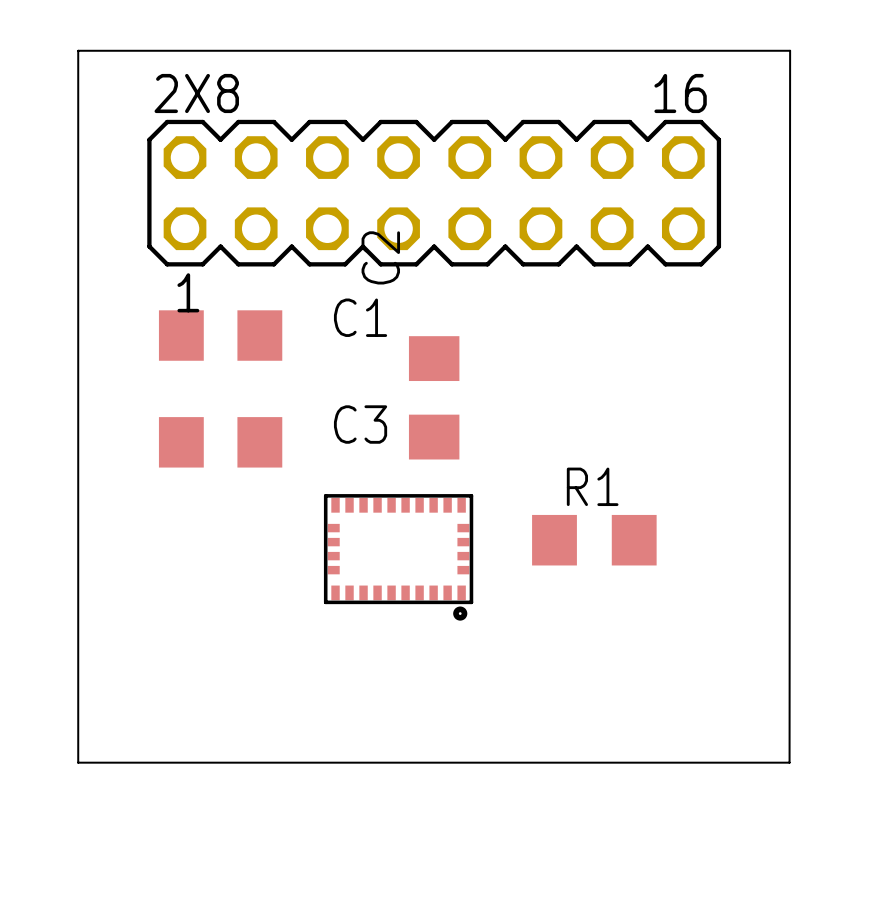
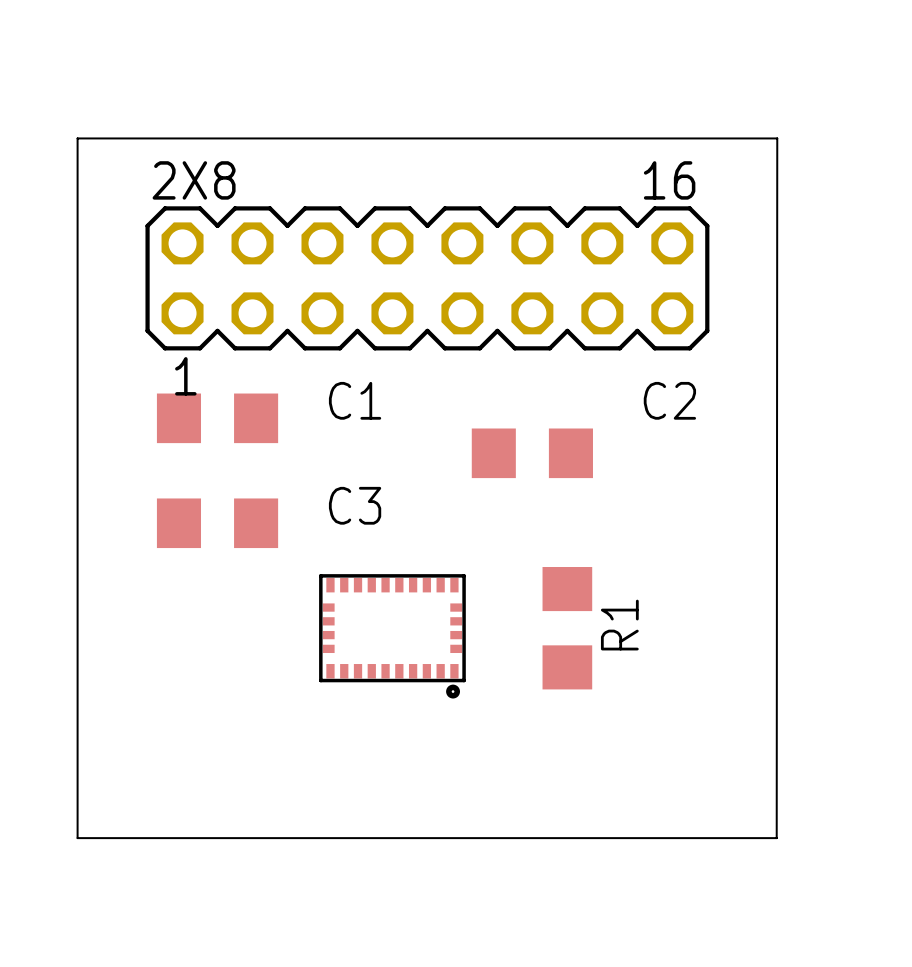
C2 rotation: 0° (434, 397) -> 90° clockwise (532, 453)
C2 position: (434, 397) -> (532, 453)
R1 rotation: 0° (594, 540) -> 90° clockwise (567, 628)

